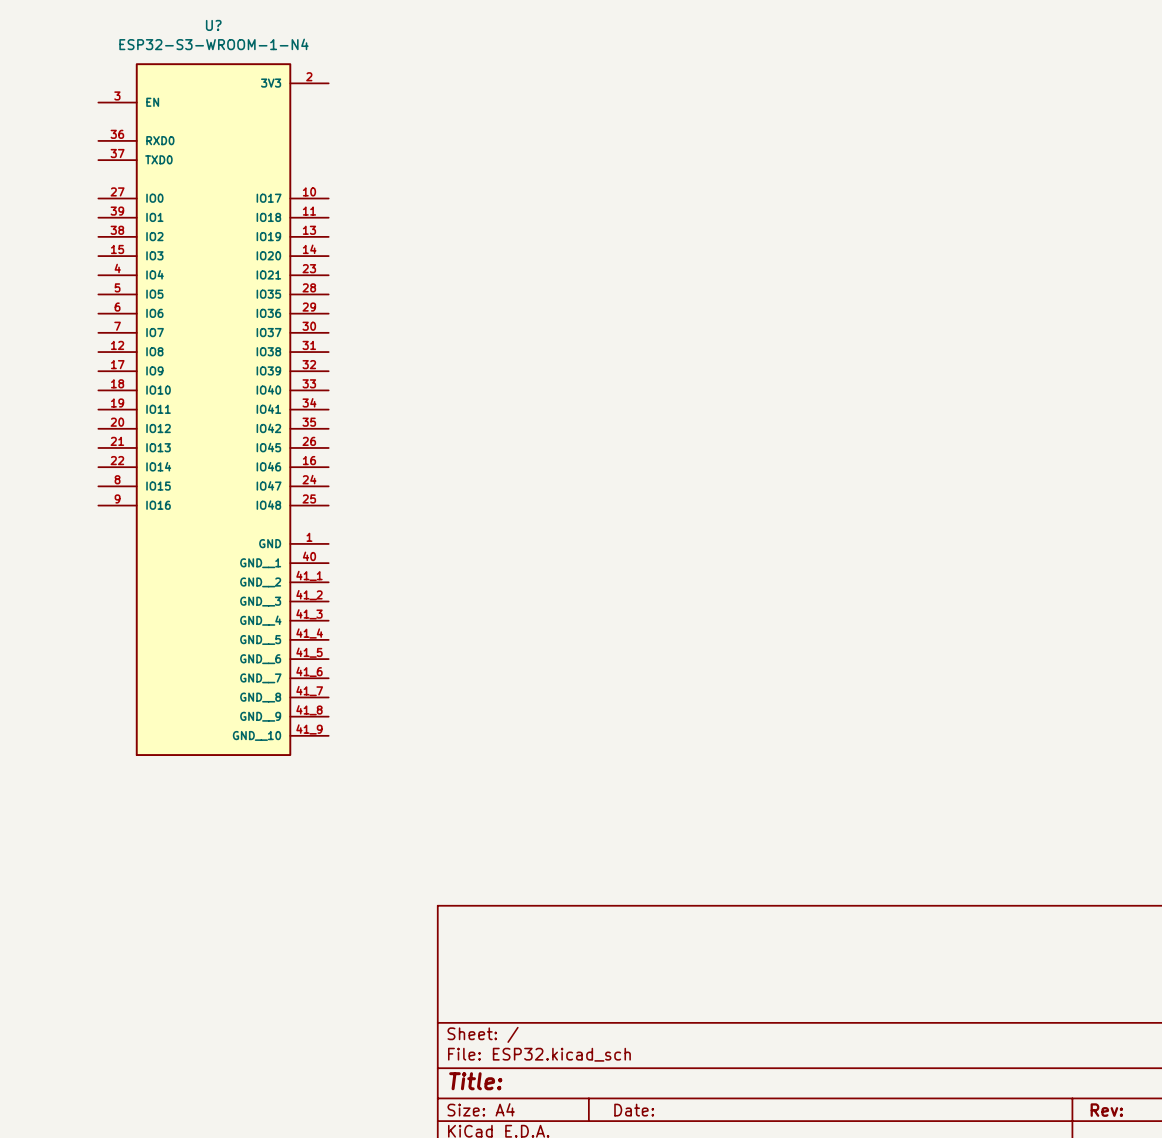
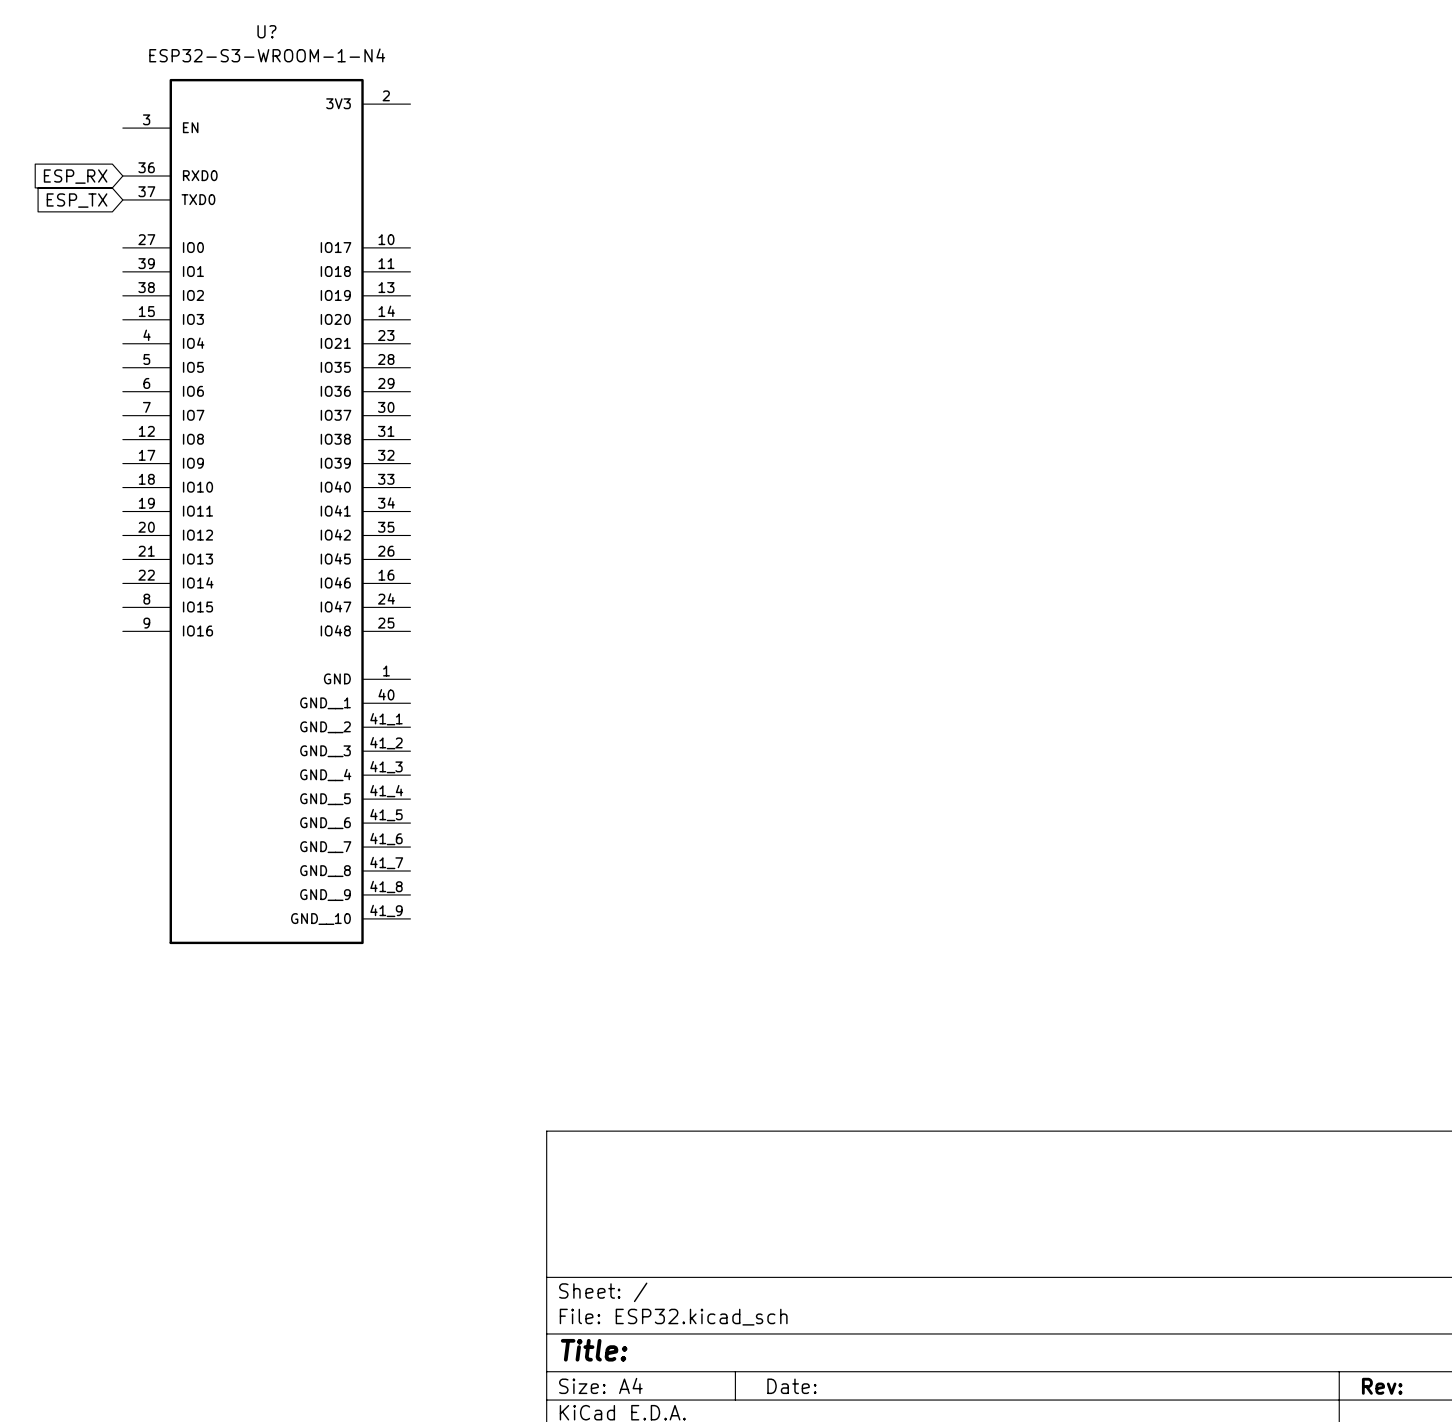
global label: none -> ESP_RX (75, 176)
global label: none -> ESP_TX (77, 200)

